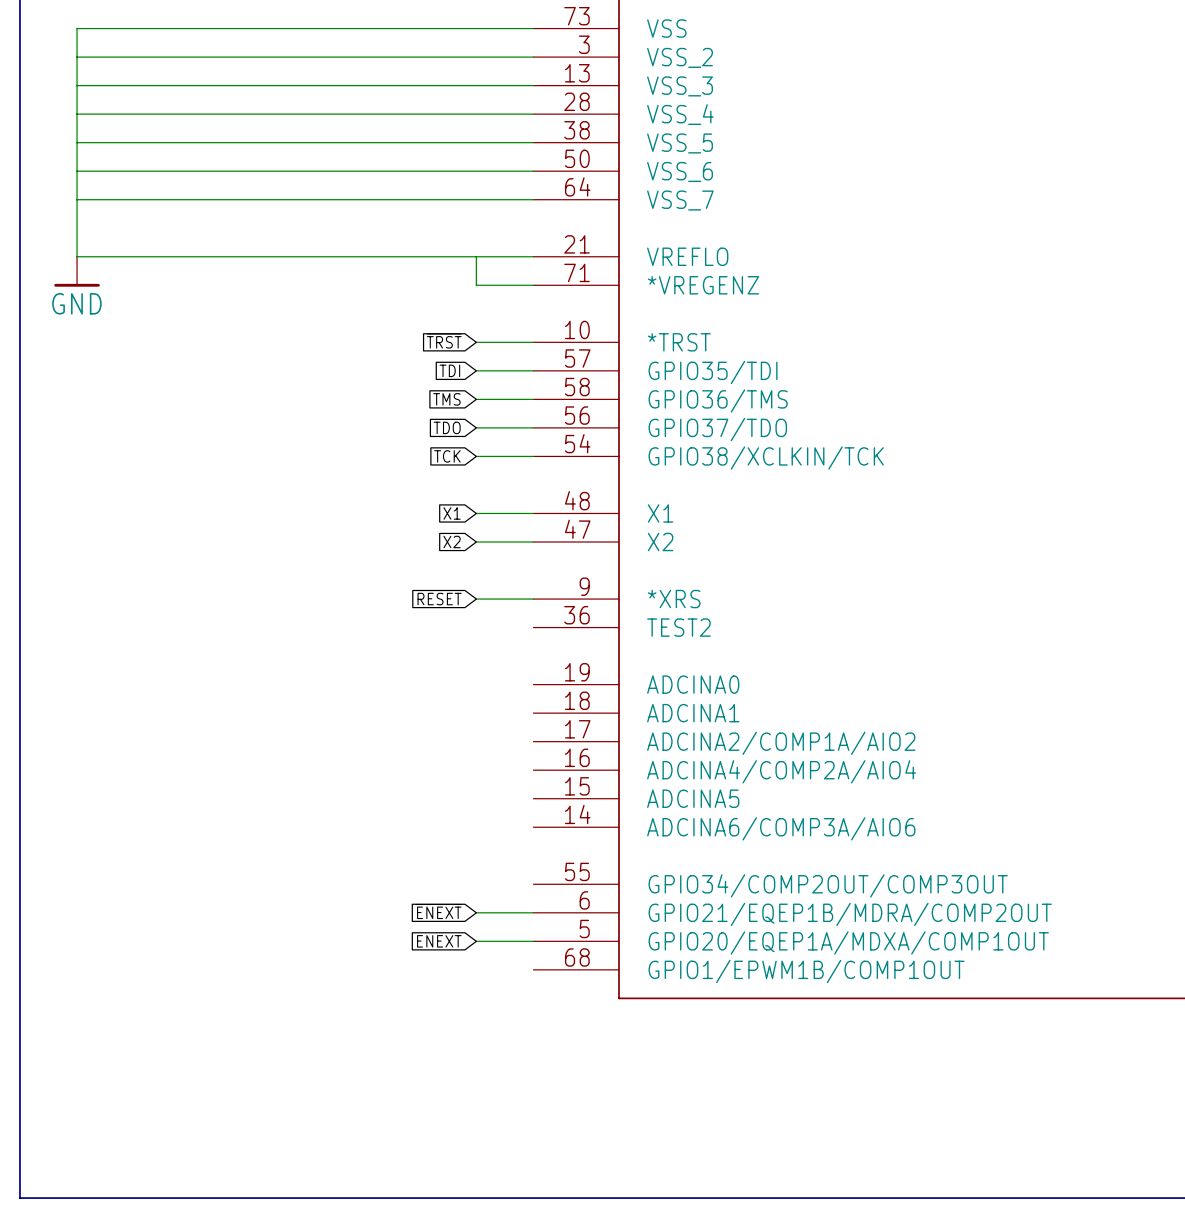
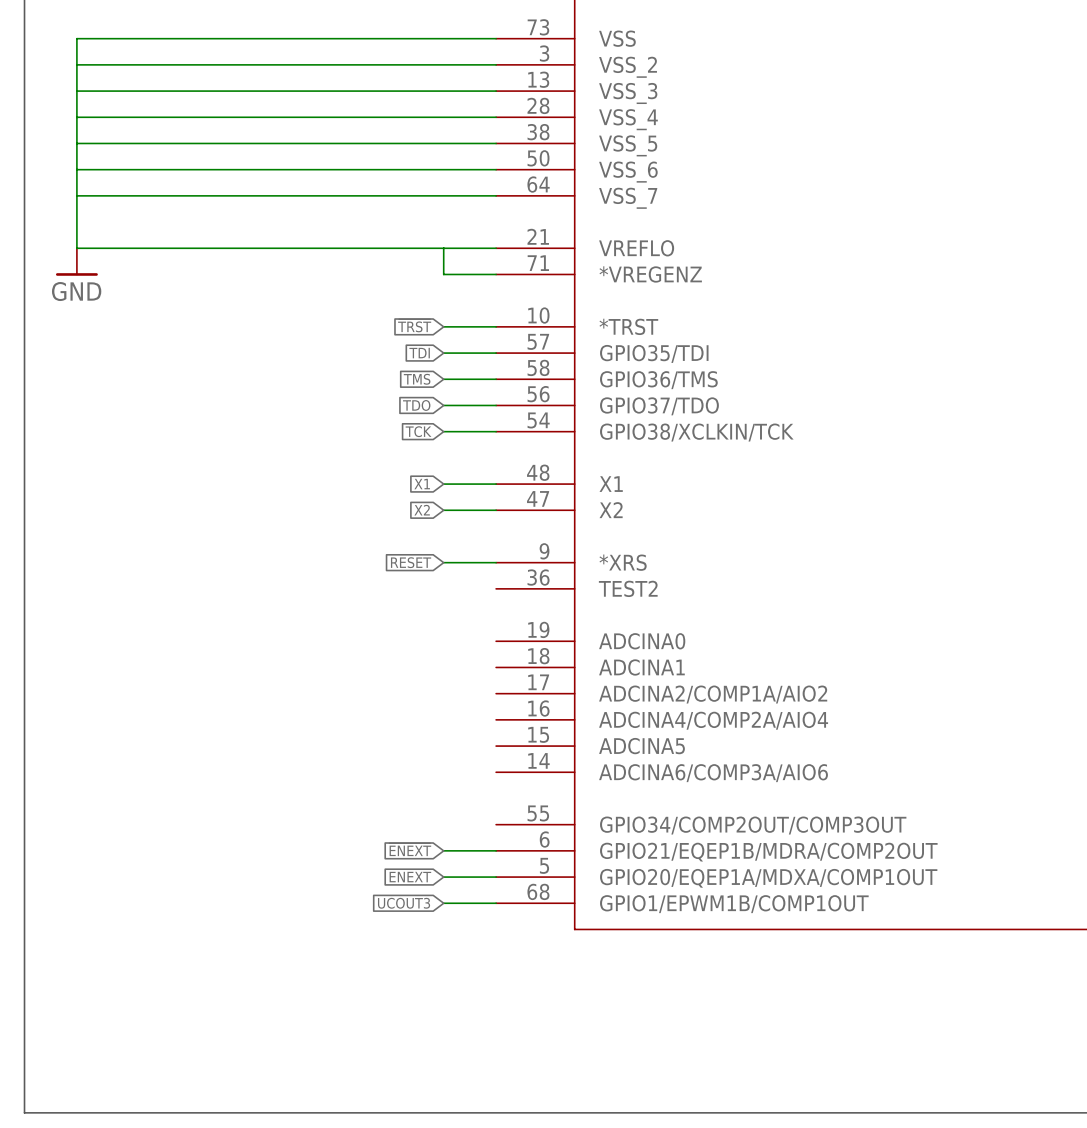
global label: none -> UCOUT3 (404, 903)
wire: none -> (443, 903) (496, 903)

